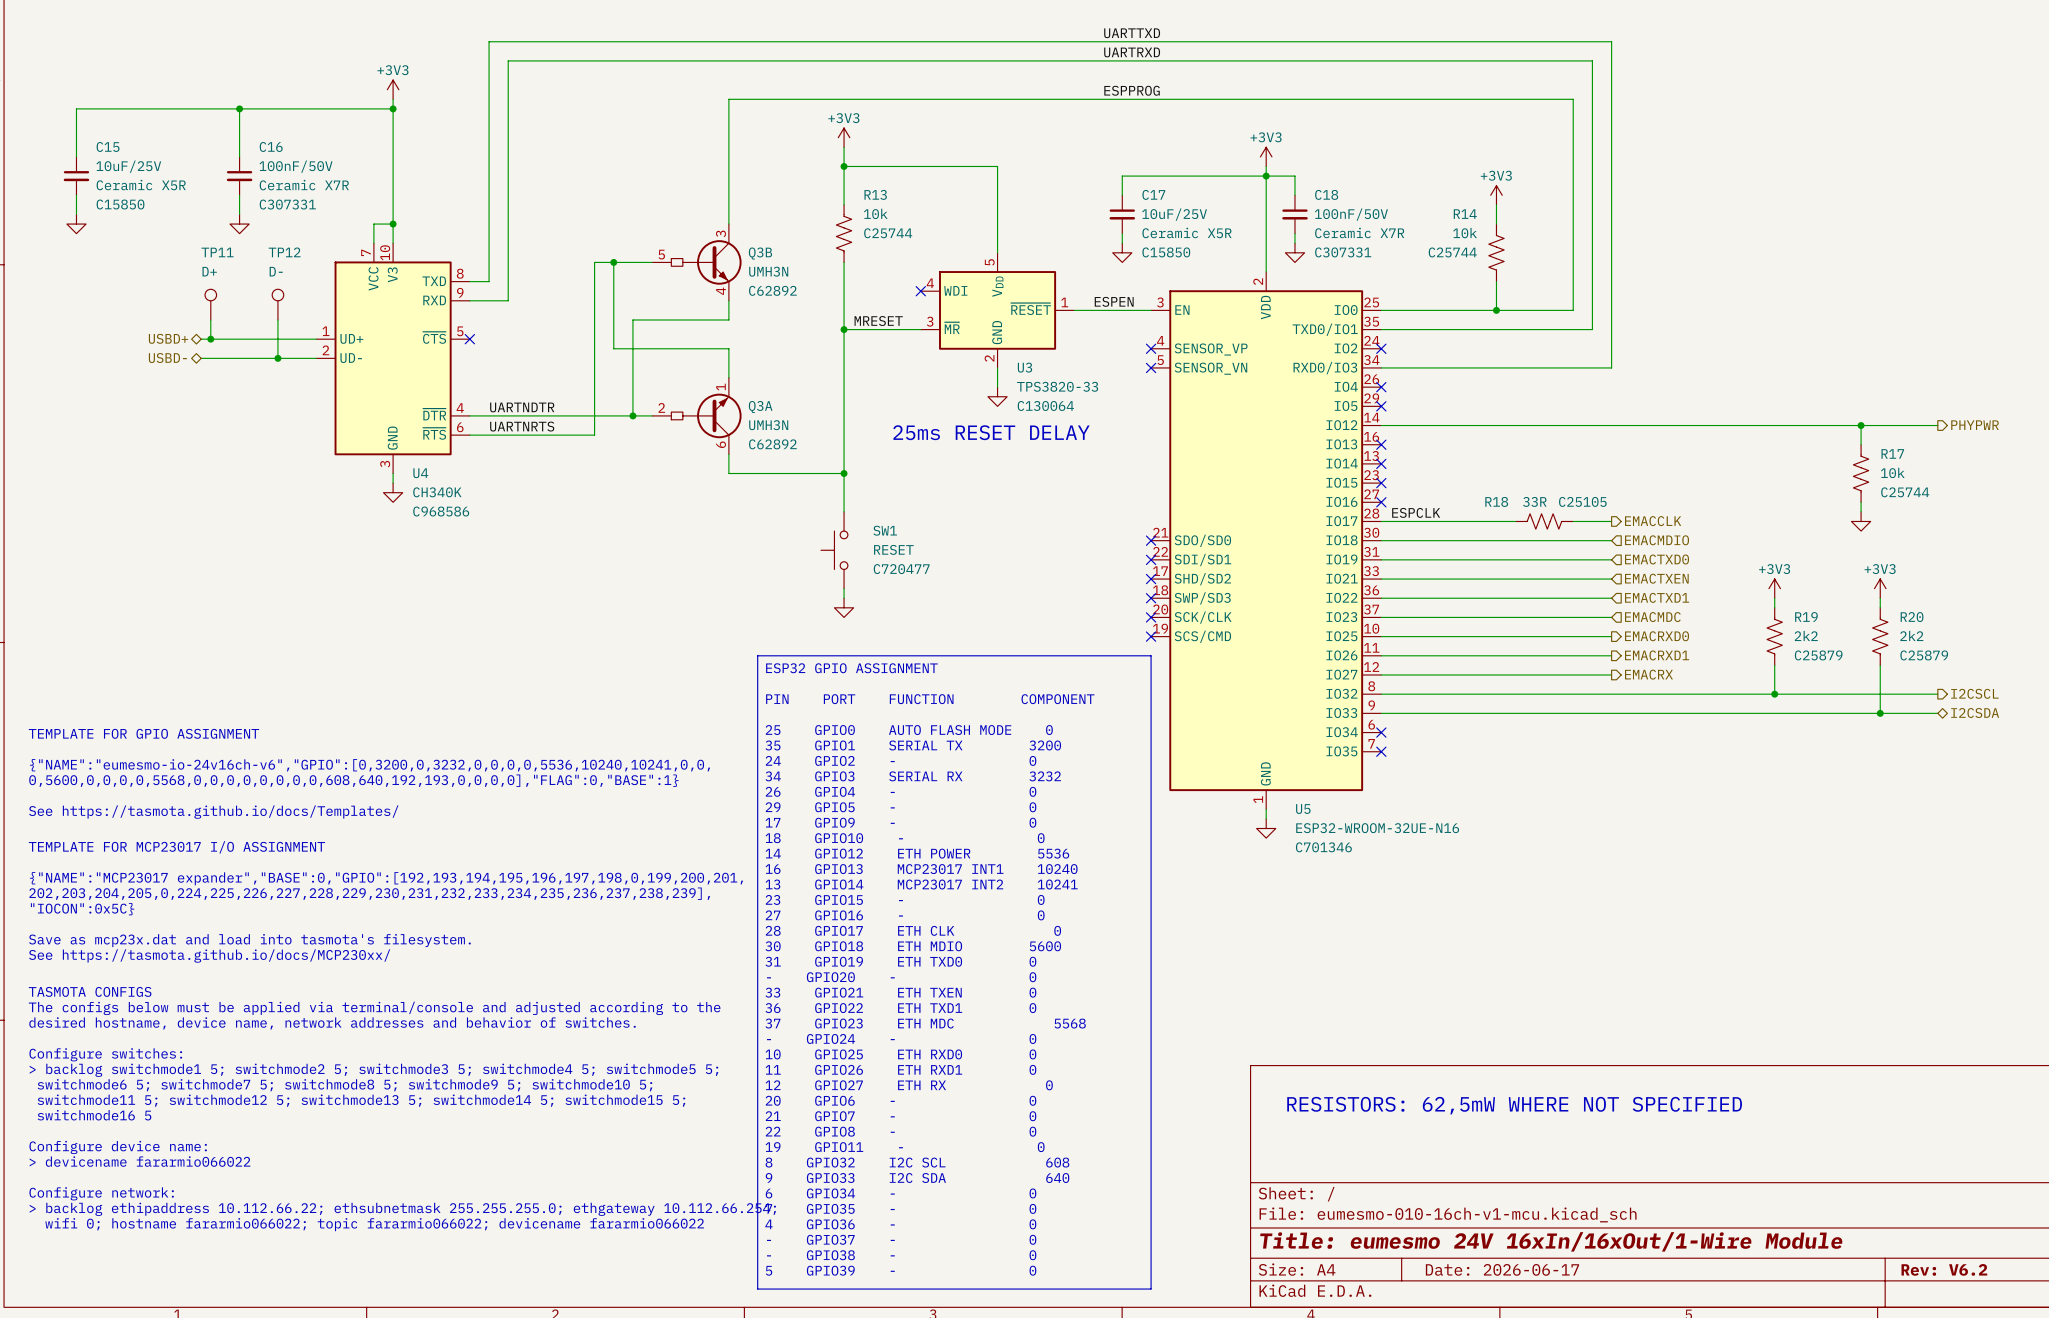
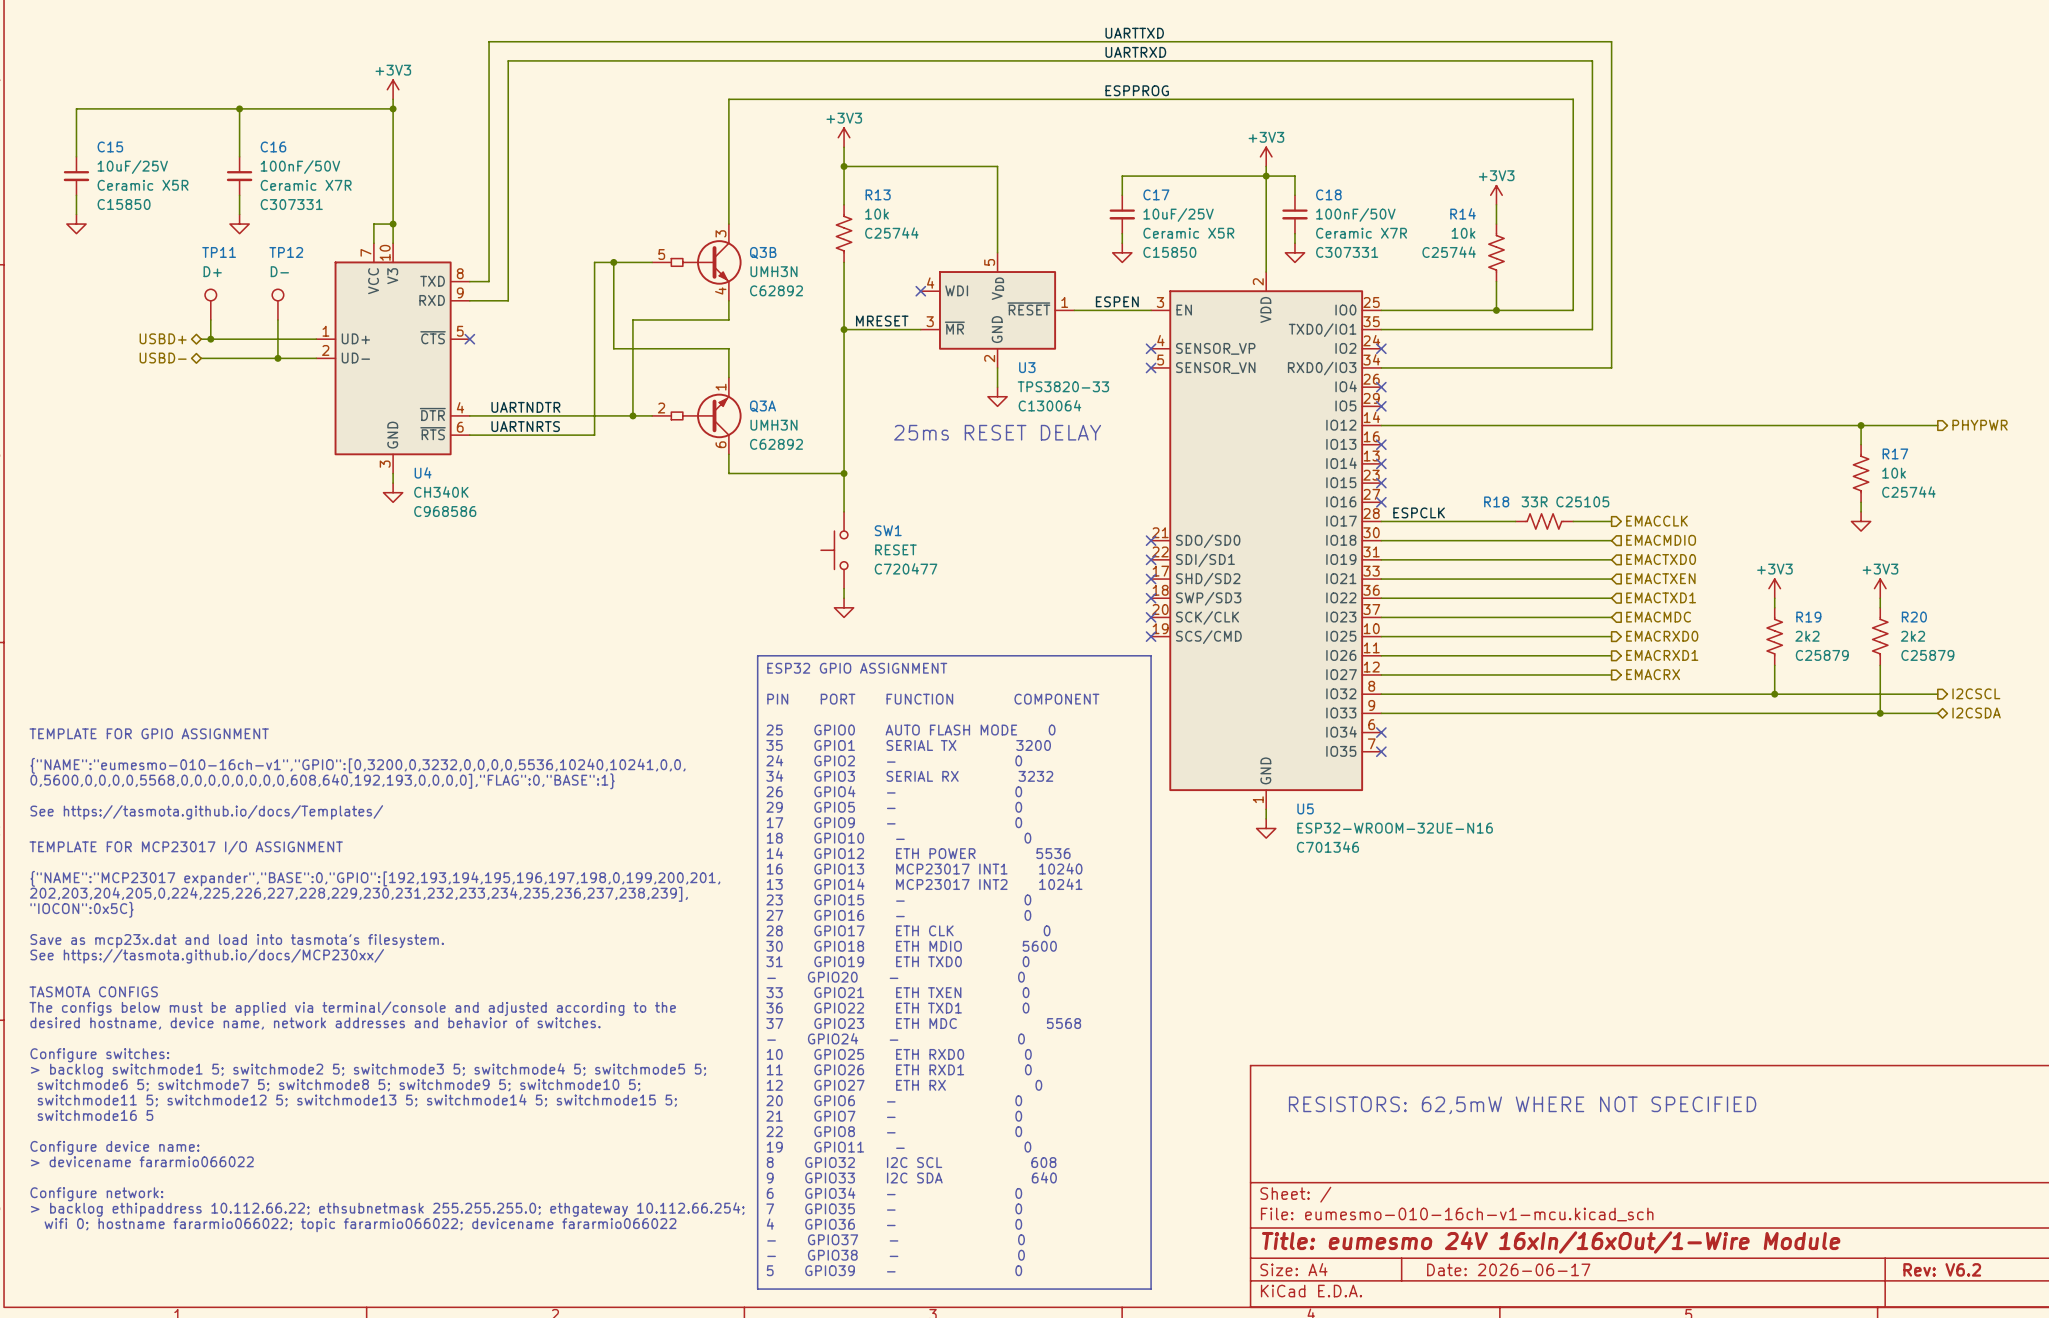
text: {"NAME":"eumesmo-io-24v16ch-v6","GPIO":[0,3200,0,3232,0,0,0,0,5536,10240,10241,0,0, (370, 765) -> {"NAME":"eumesmo-010-16ch-v1","GPIO":[0,3200,0,3232,0,0,0,0,5536,10240,10241,0,0, (357, 765)

